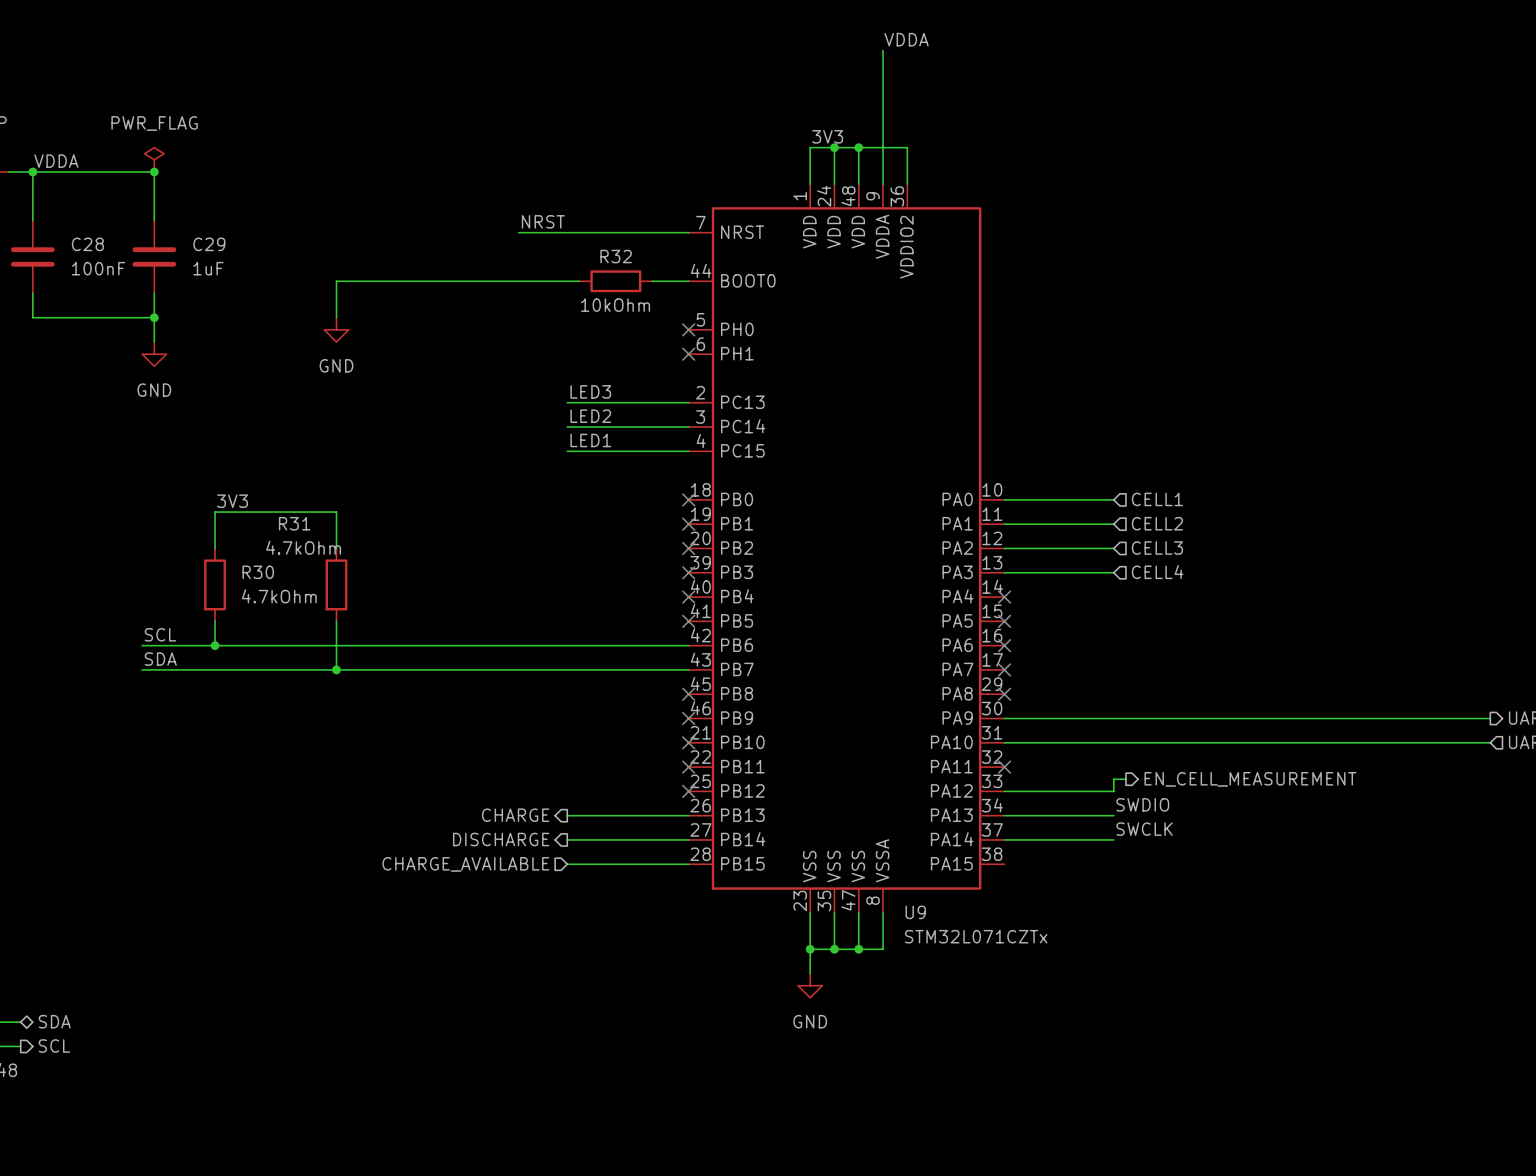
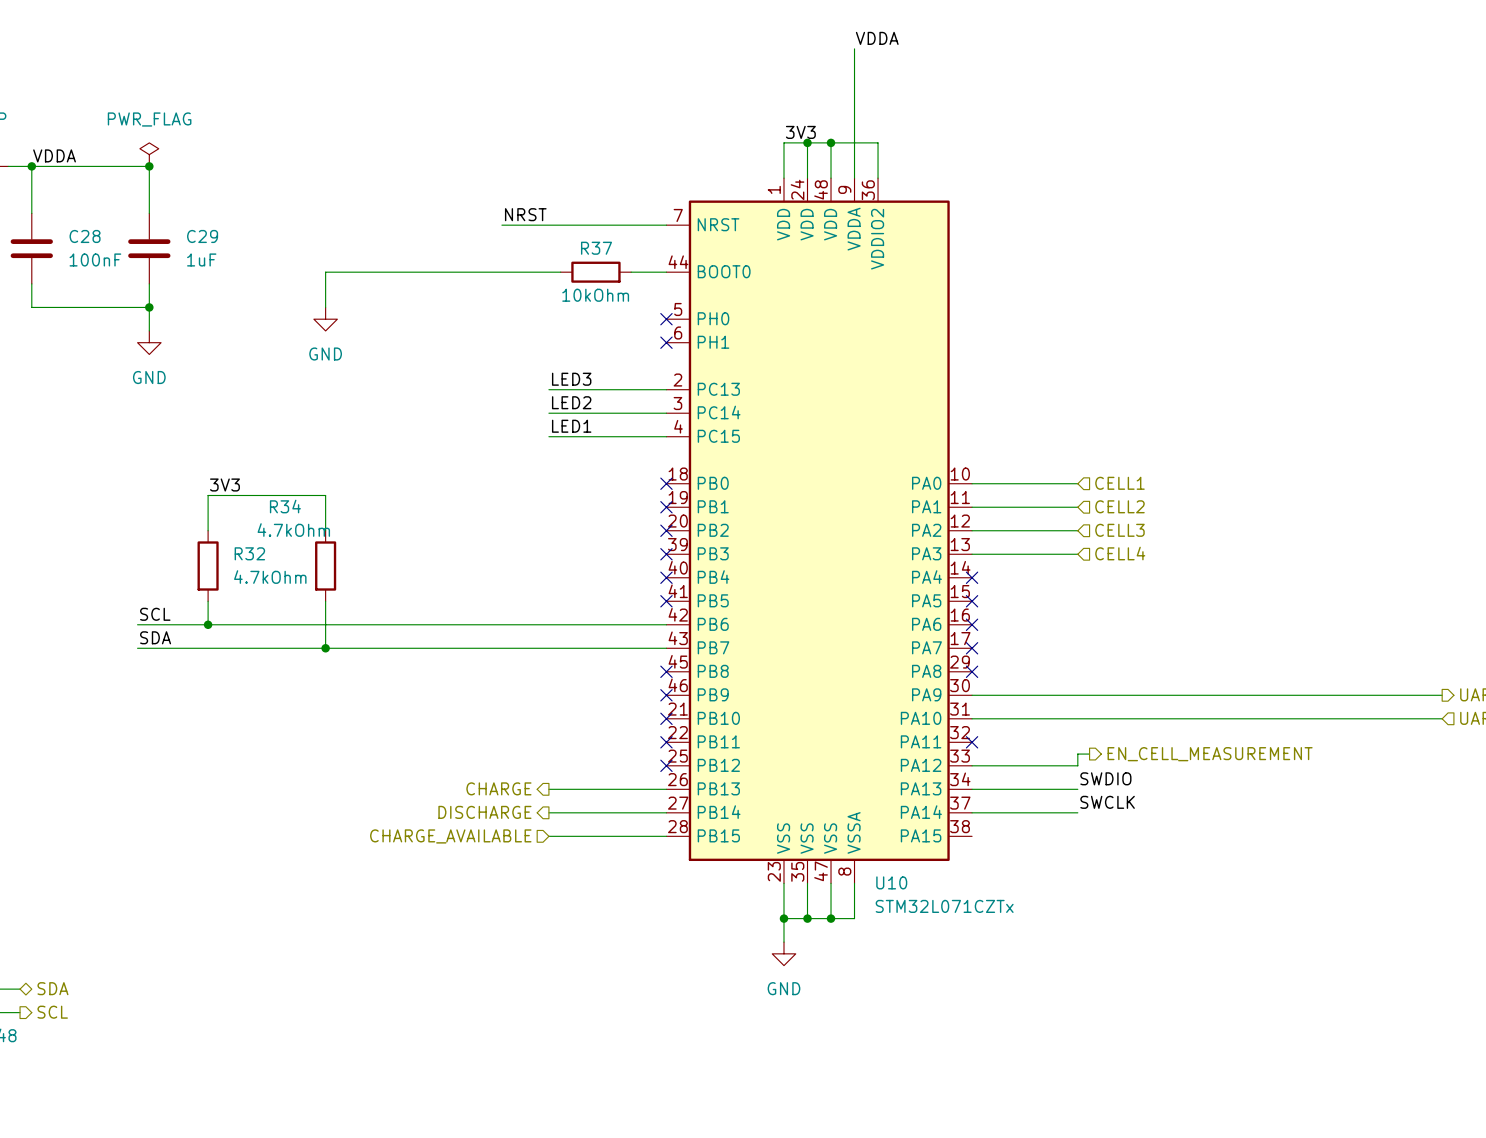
R32 name: R32 (616, 256) -> R37 (596, 248)
R31 name: R31 (294, 523) -> R34 (285, 506)
R30 name: R30 (258, 572) -> R32 (249, 553)
U9 name: U9 (915, 912) -> U10 (891, 882)

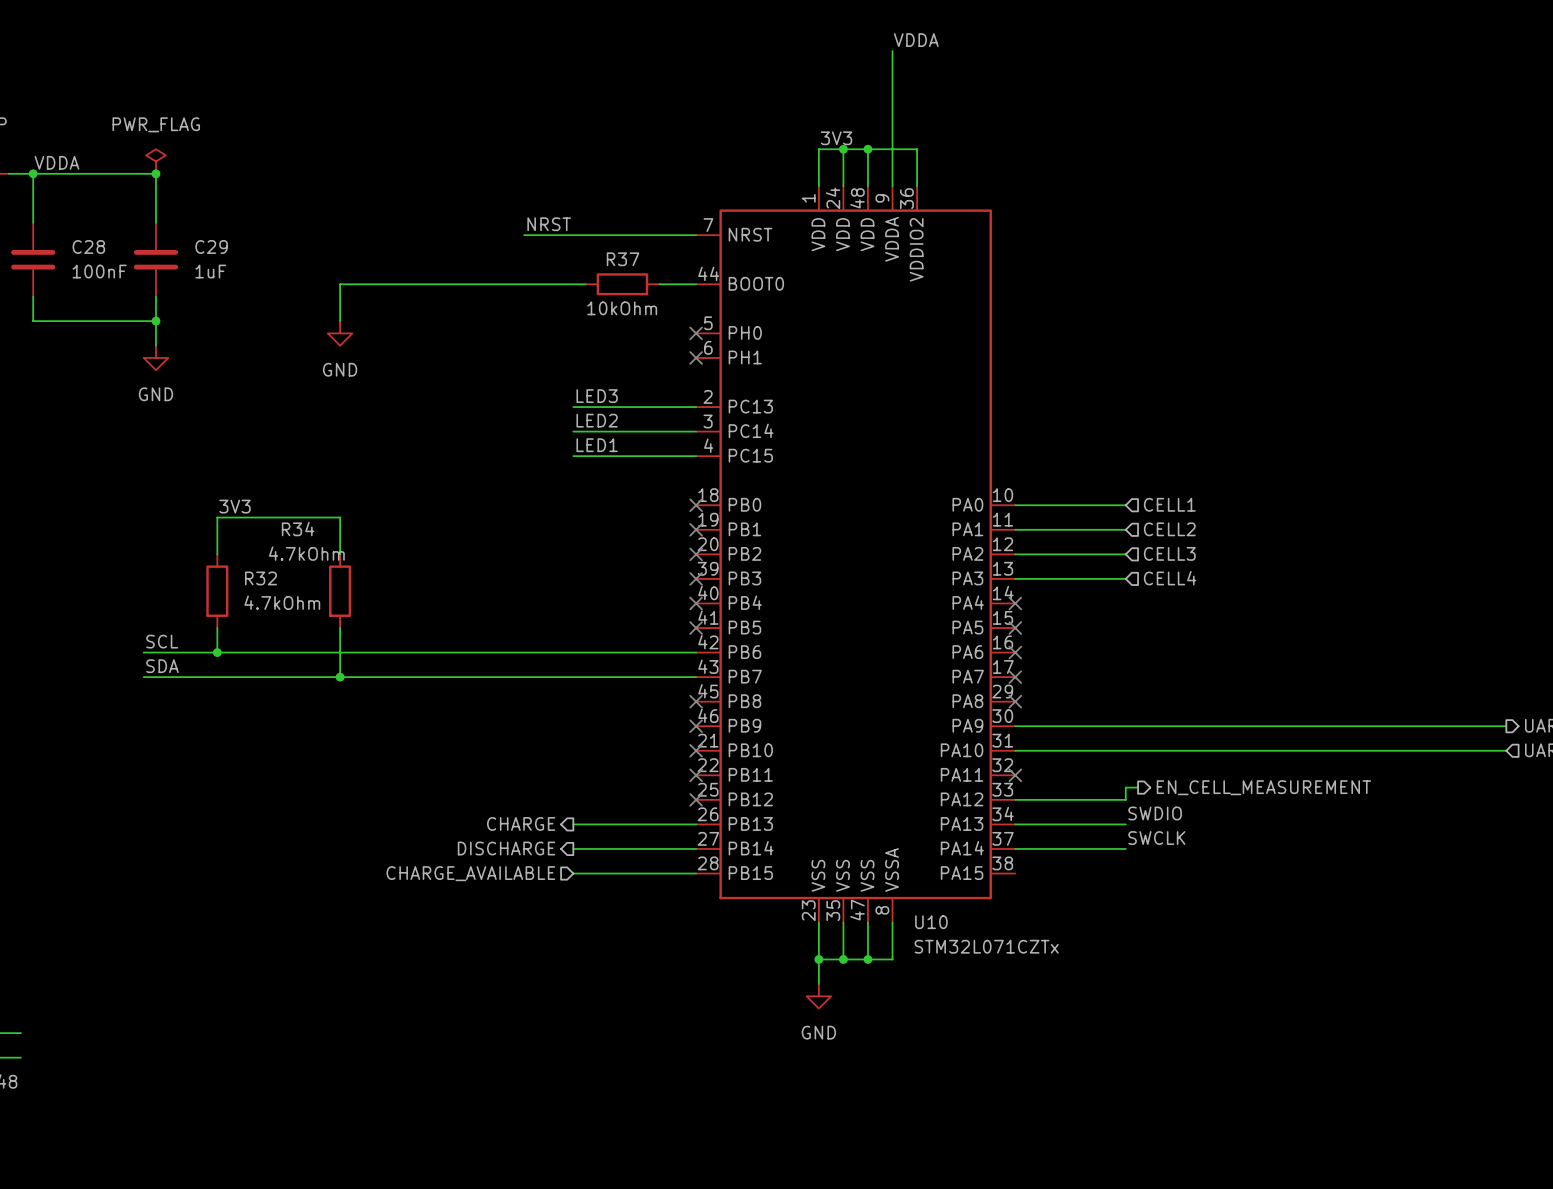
hierarchical label: SDA (52, 988) -> none
hierarchical label: SCL (52, 1012) -> none

